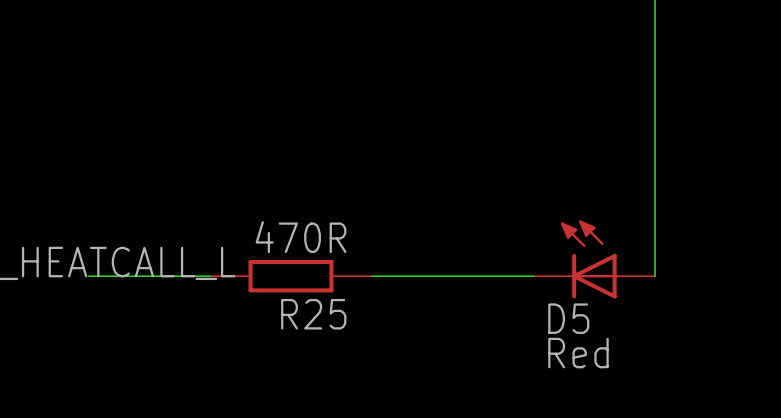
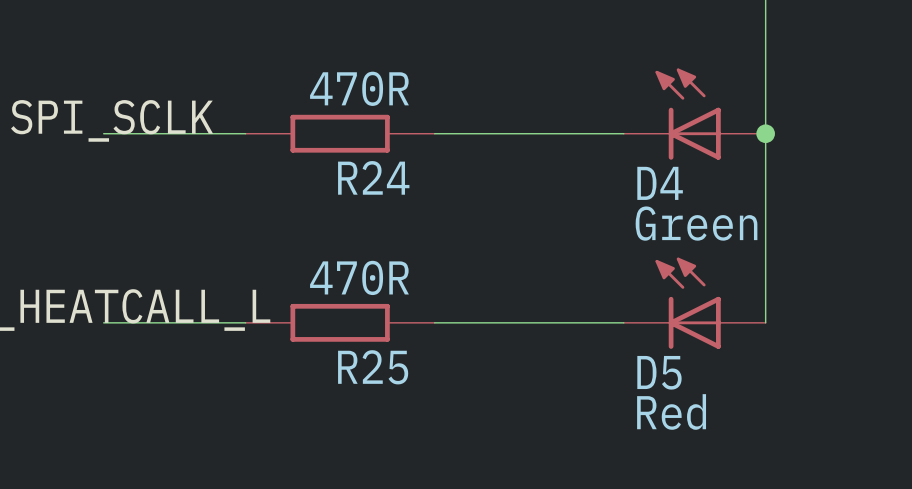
D4: none -> Green (694, 114)
label: none -> SPI_SCLK (112, 120)
wire: none -> (103, 133) (245, 133)
R24: none -> 470R (340, 133)
wire: none -> (434, 133) (623, 133)
junction: none -> (765, 133)

